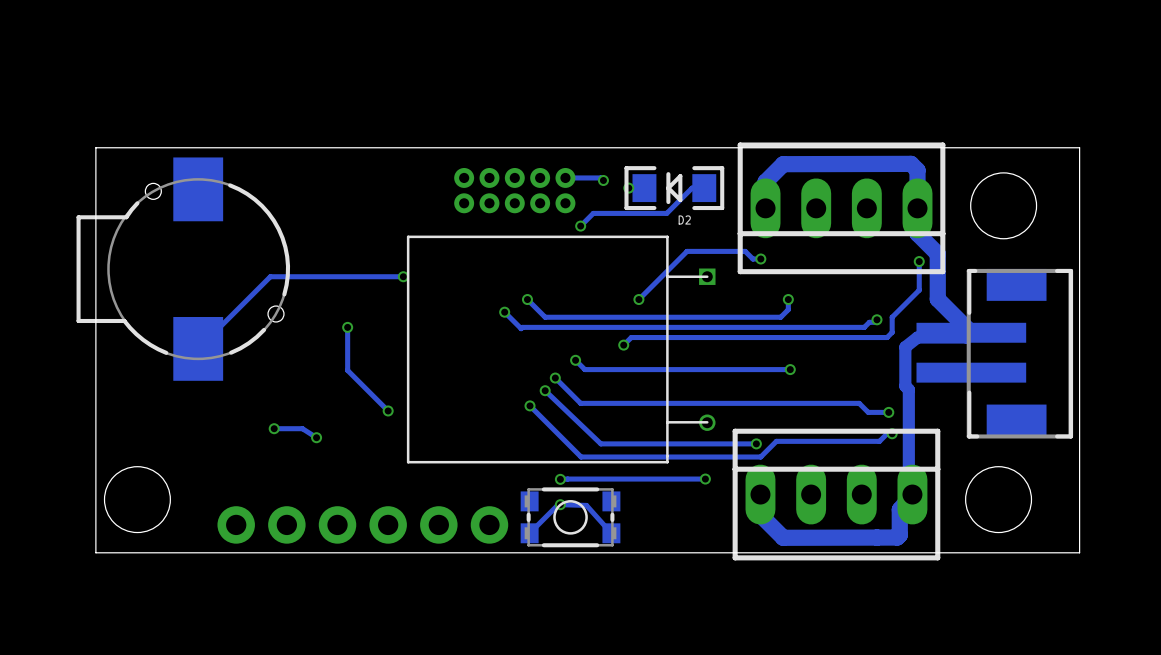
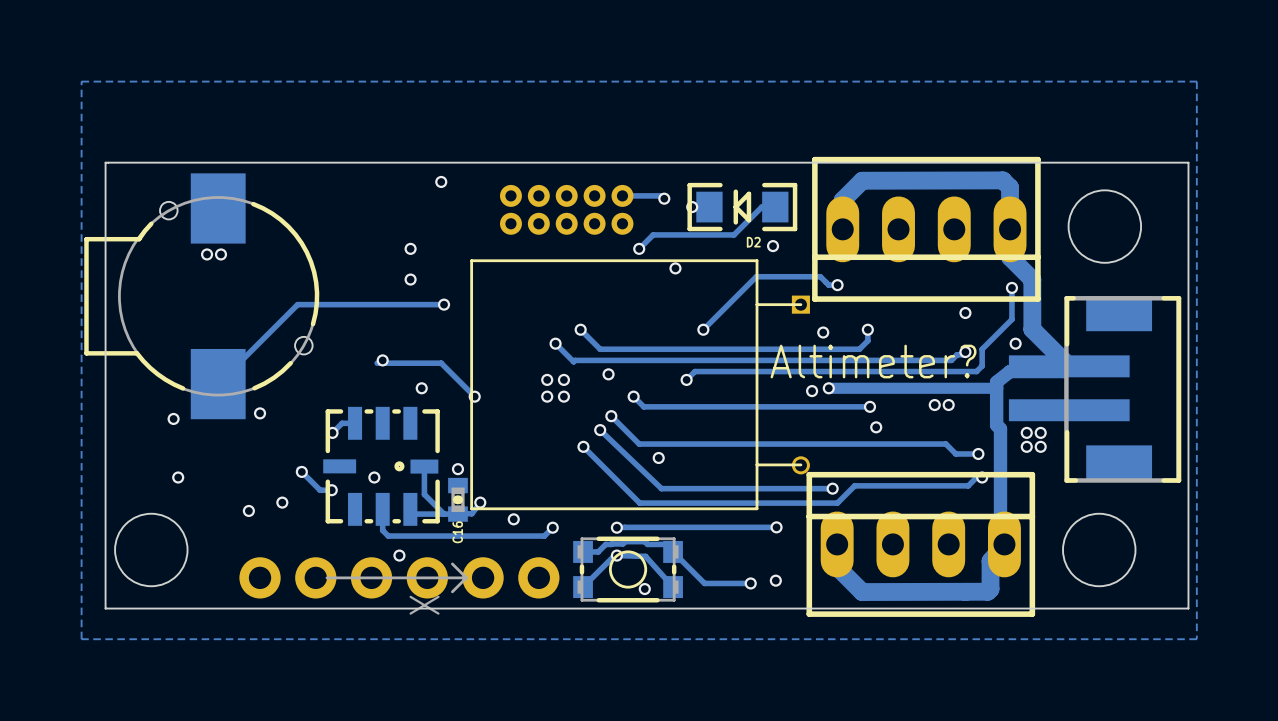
zone outline: none -> (1196, 81) (81, 81) (81, 639) (1196, 639) (1196, 81)
via: none -> (441, 181)
via: none -> (773, 246)
via: none -> (410, 248)
via: none -> (207, 254)
via: none -> (220, 254)
via: none -> (675, 268)
via: none -> (410, 279)
via: none -> (965, 313)
via: none -> (823, 332)
via: none -> (1015, 343)
track: (347, 327) (347, 370) (388, 410) -> none
text: none -> Altimeter? (873, 361)
track: none -> (377, 363) (441, 363) (474, 396)
via: none -> (608, 374)
via: none -> (547, 379)
via: none -> (563, 379)
part position: (561, 349) -> (640, 384)
via: none -> (421, 388)
via: none -> (828, 388)
track: none -> (996, 388) (828, 388)
via: none -> (812, 391)
via: none -> (474, 396)
via: none -> (547, 396)
via: none -> (563, 396)
via: none -> (934, 405)
via: none -> (948, 405)
via: none -> (260, 413)
via: none -> (173, 418)
track: none -> (355, 423) (342, 423) (332, 432)
via: none -> (876, 427)
via: none -> (332, 432)
via: none -> (1026, 432)
via: none -> (1040, 432)
via: none -> (1026, 446)
via: none -> (1040, 446)
via: (388, 410) -> none
via: none -> (658, 457)
track: none -> (424, 466) (424, 494) (444, 514)
track: none -> (299, 469) (320, 490) (331, 490)
via: none -> (457, 469)
track: (274, 428) (302, 428) (316, 437) -> none
via: none -> (178, 477)
via: none -> (374, 477)
via: (316, 437) -> none
via: none -> (331, 490)
part: none -> (395, 500)
C16: none -> (457, 499)
via: none -> (282, 502)
track: none -> (480, 502) (471, 513) (415, 514) (410, 509)
via: none -> (480, 502)
track: none -> (382, 509) (382, 530) (388, 536) (544, 536) (552, 527)
via: none -> (248, 510)
via: none -> (513, 519)
via: none -> (552, 527)
track: none -> (583, 551) (598, 551) (605, 544) (622, 543) (625, 541) (665, 544) (704, 583) (750, 583)
via: none -> (399, 555)
via: none -> (775, 580)
via: none -> (750, 583)
via: none -> (644, 589)

